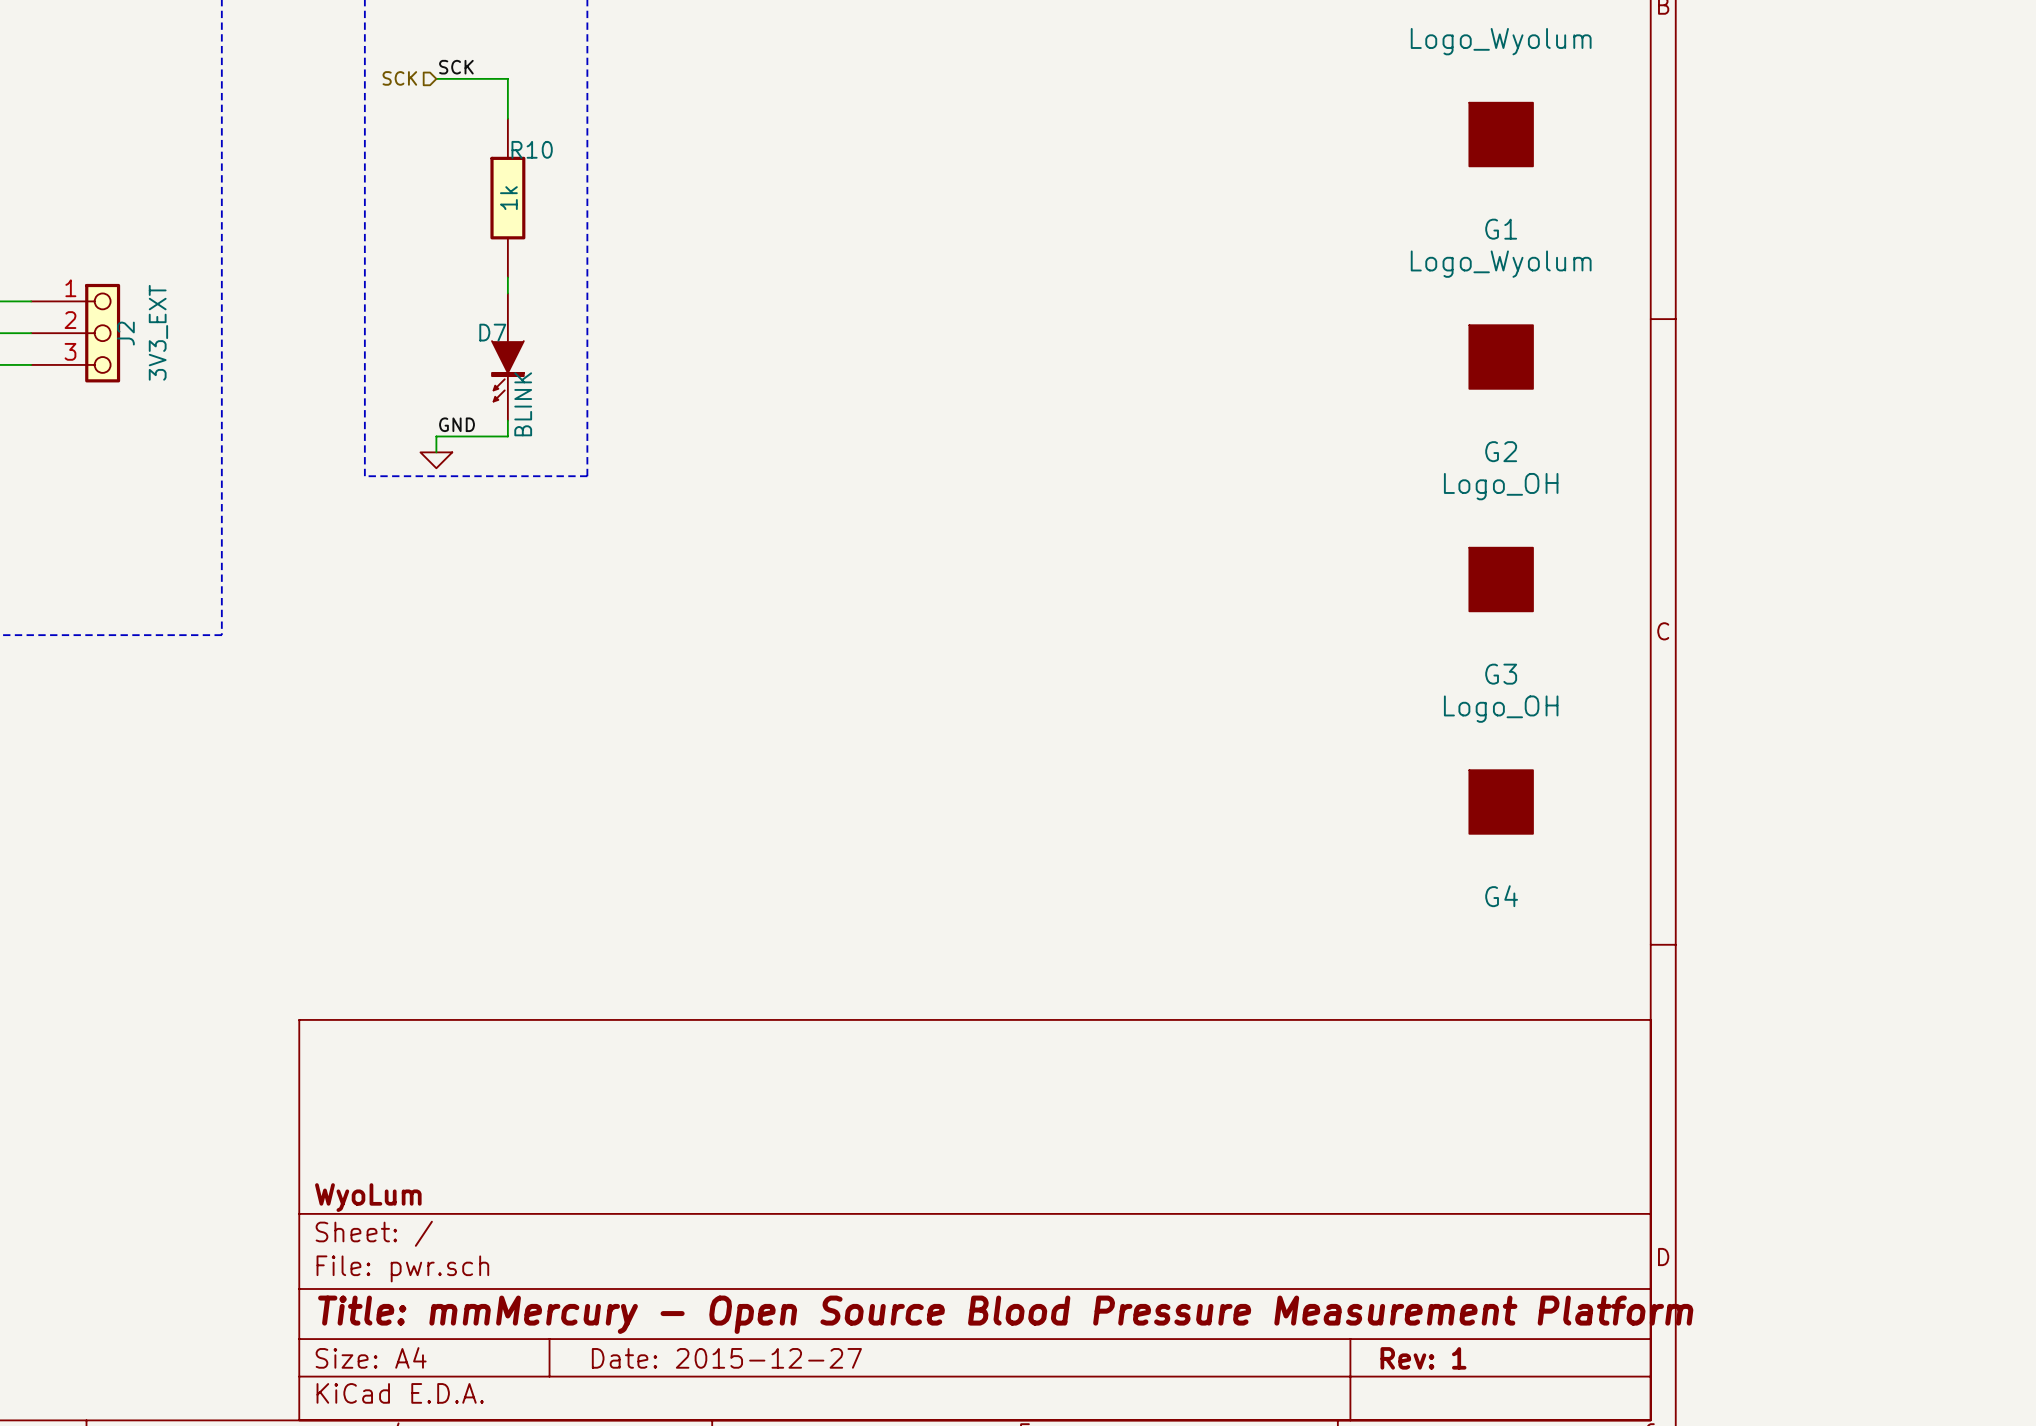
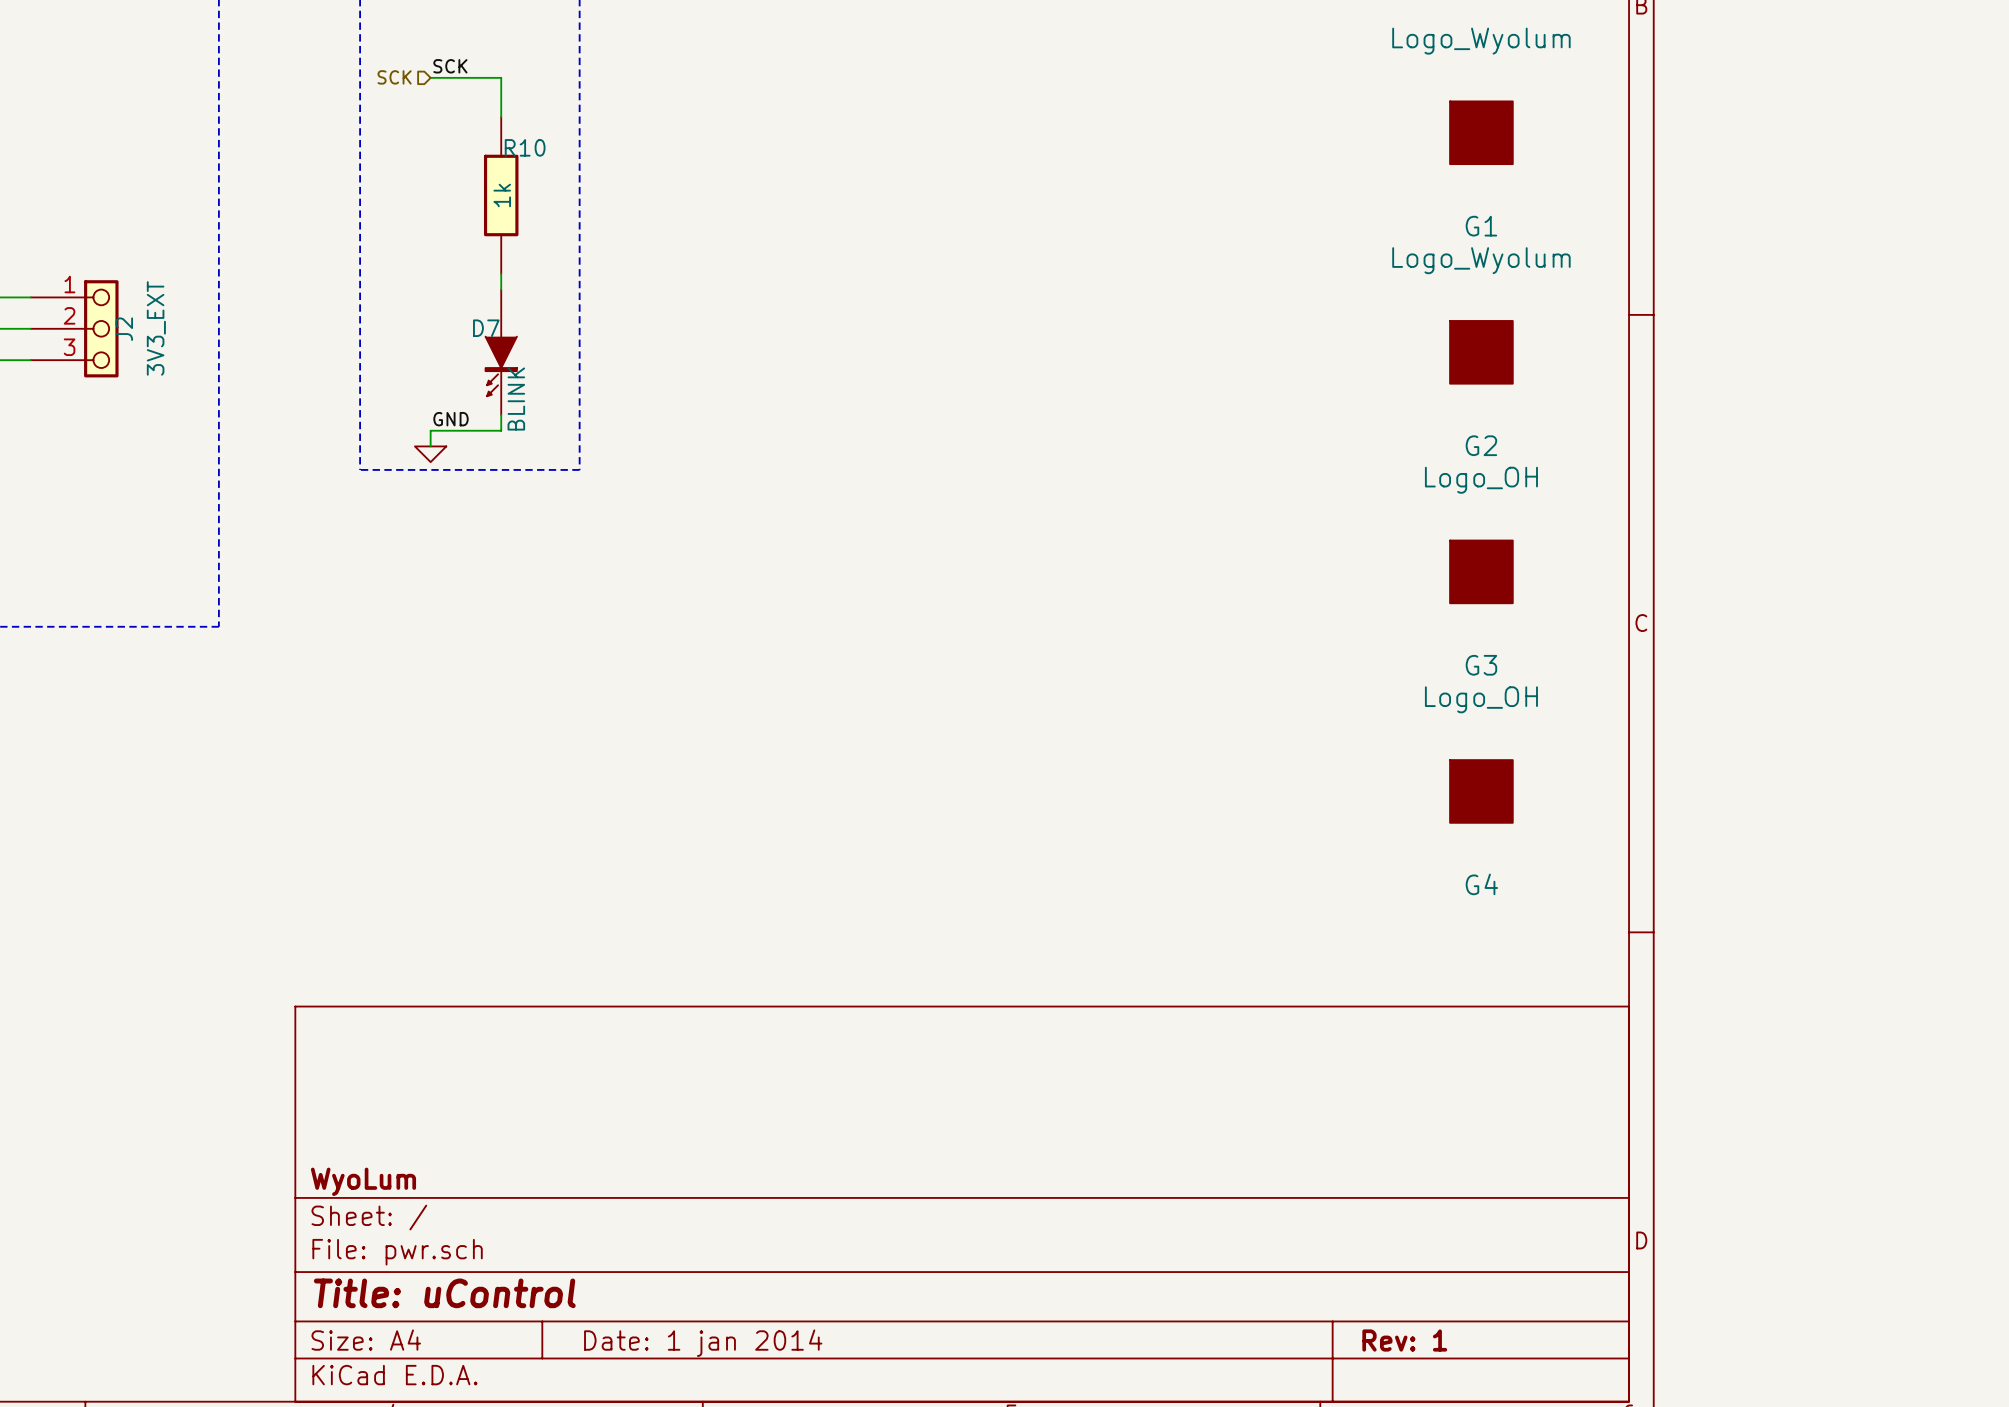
title block: Title: mmMercury - Open Source Blood Pressure Measurement Platform (1005, 1314) -> Title: uControl (444, 1293)
title block: Date: 2015-12-27 (726, 1358) -> Date: 1 jan 2014 (703, 1343)

